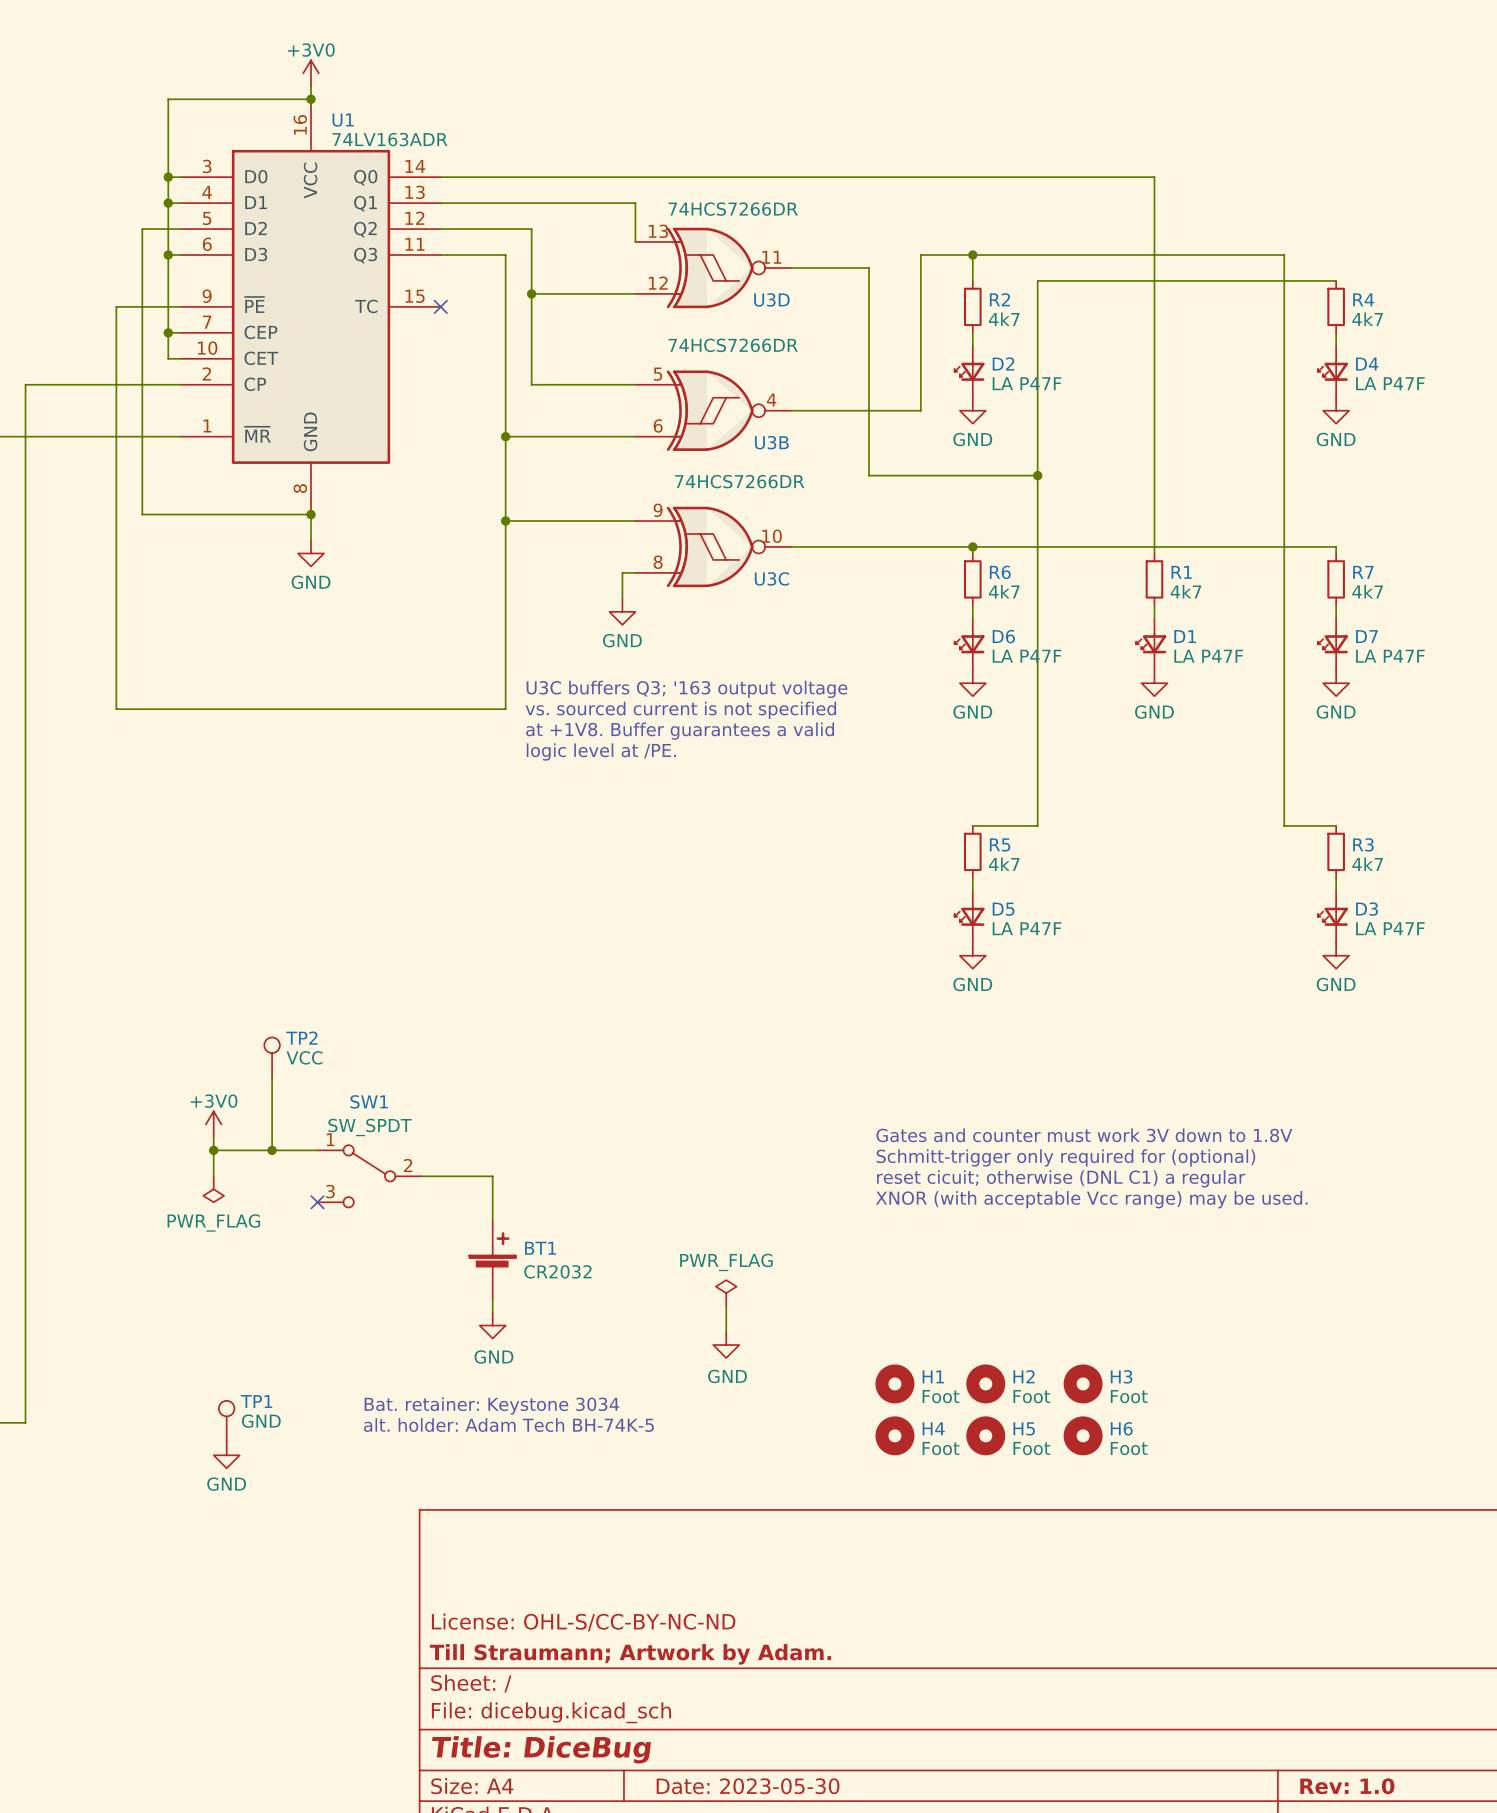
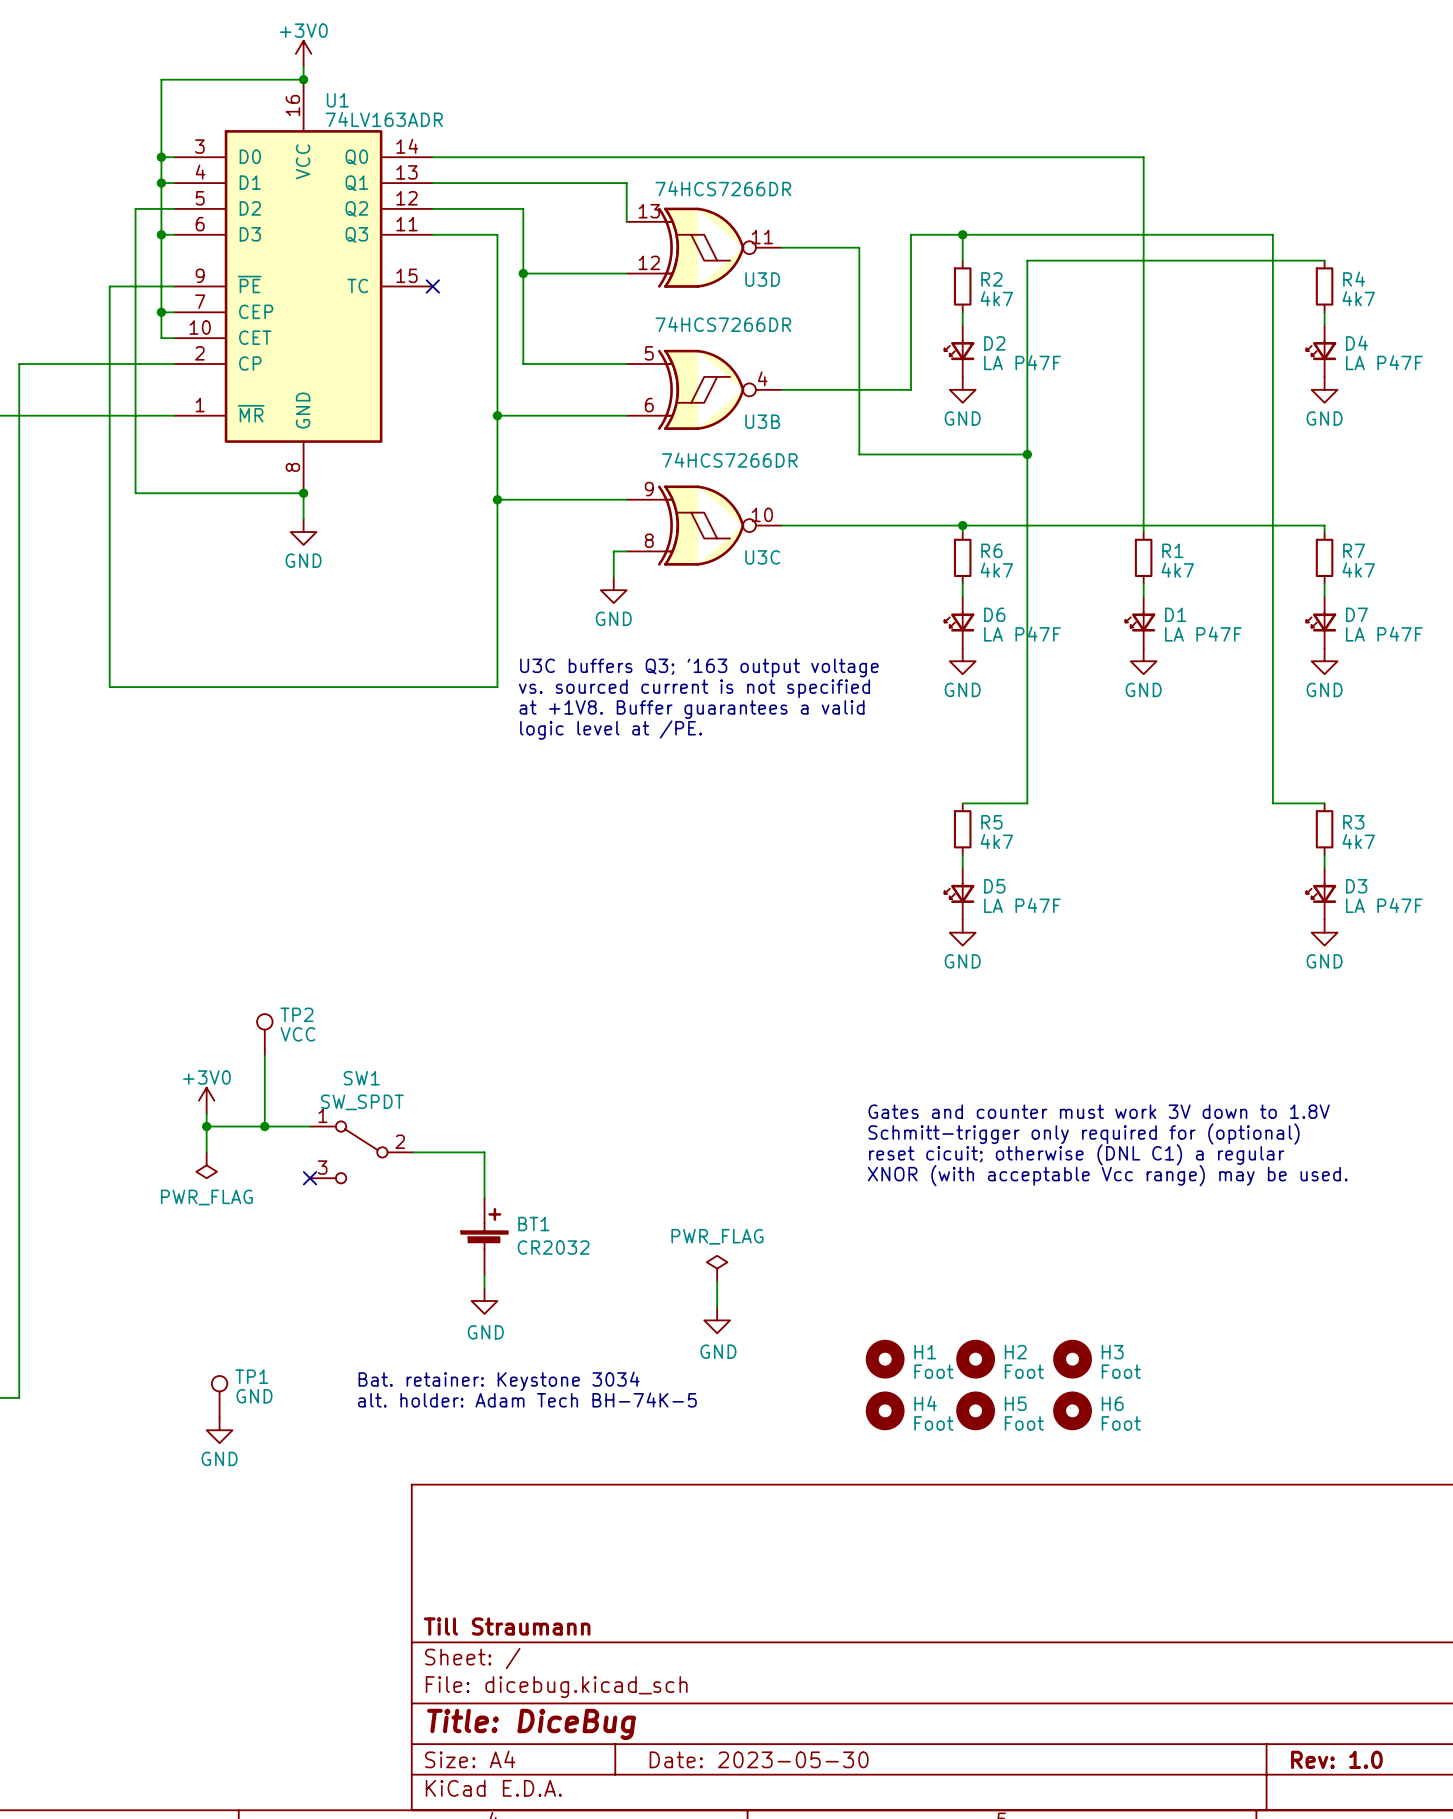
title block: License: OHL-S/CC-BY-NC-ND (583, 1622) -> none
title block: Till Straumann; Artwork by Adam. (630, 1654) -> Till Straumann (507, 1626)

